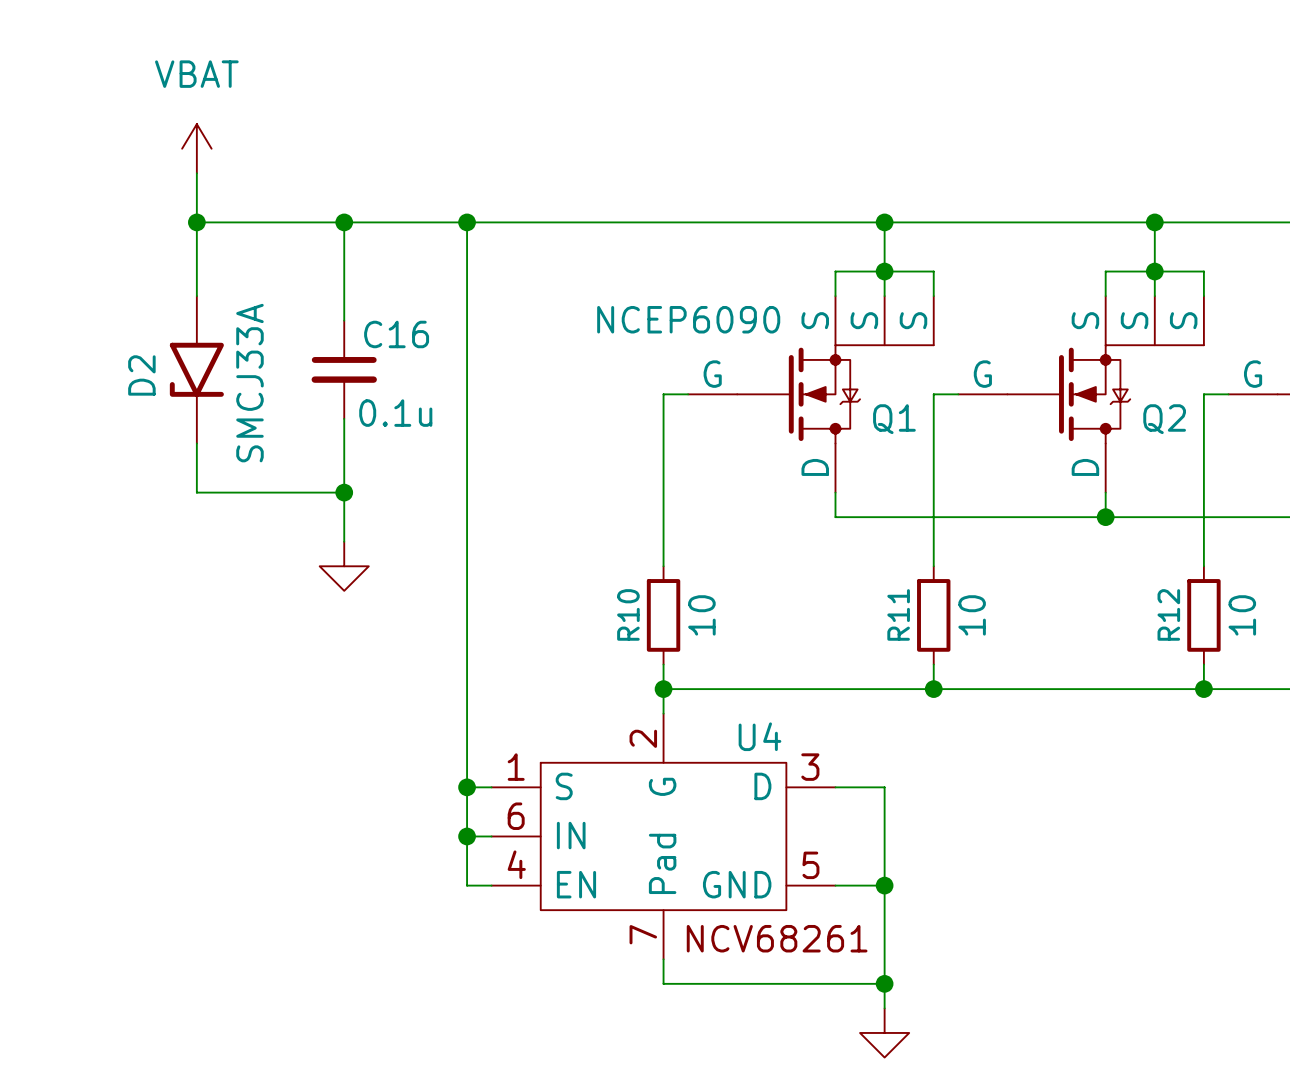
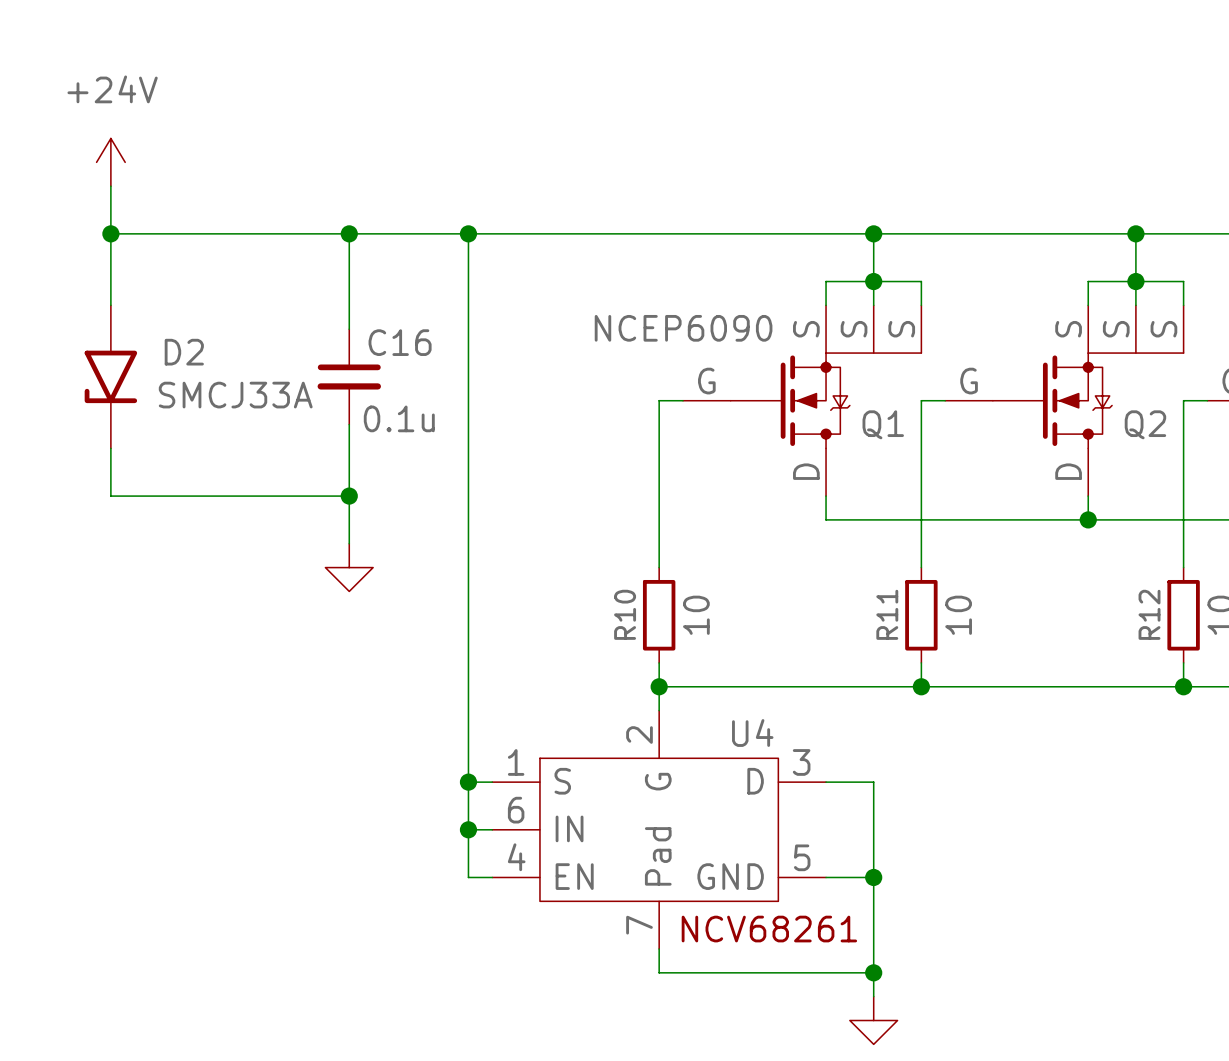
power symbol: none -> +24V (110, 162)
power symbol: VBAT (196, 148) -> none
wire: (196, 173) (196, 296) -> (110, 186) (110, 305)
wire: none -> (110, 233) (206, 233)
junction position: (196, 222) -> (110, 233)
D2 position: (196, 369) -> (110, 376)
D2 name rotation: 0° (141, 375) -> 90° clockwise (184, 352)
D2 value rotation: 0° (249, 383) -> 90° clockwise (235, 395)
wire: (196, 443) (196, 492) -> (110, 448) (110, 496) (206, 496)

